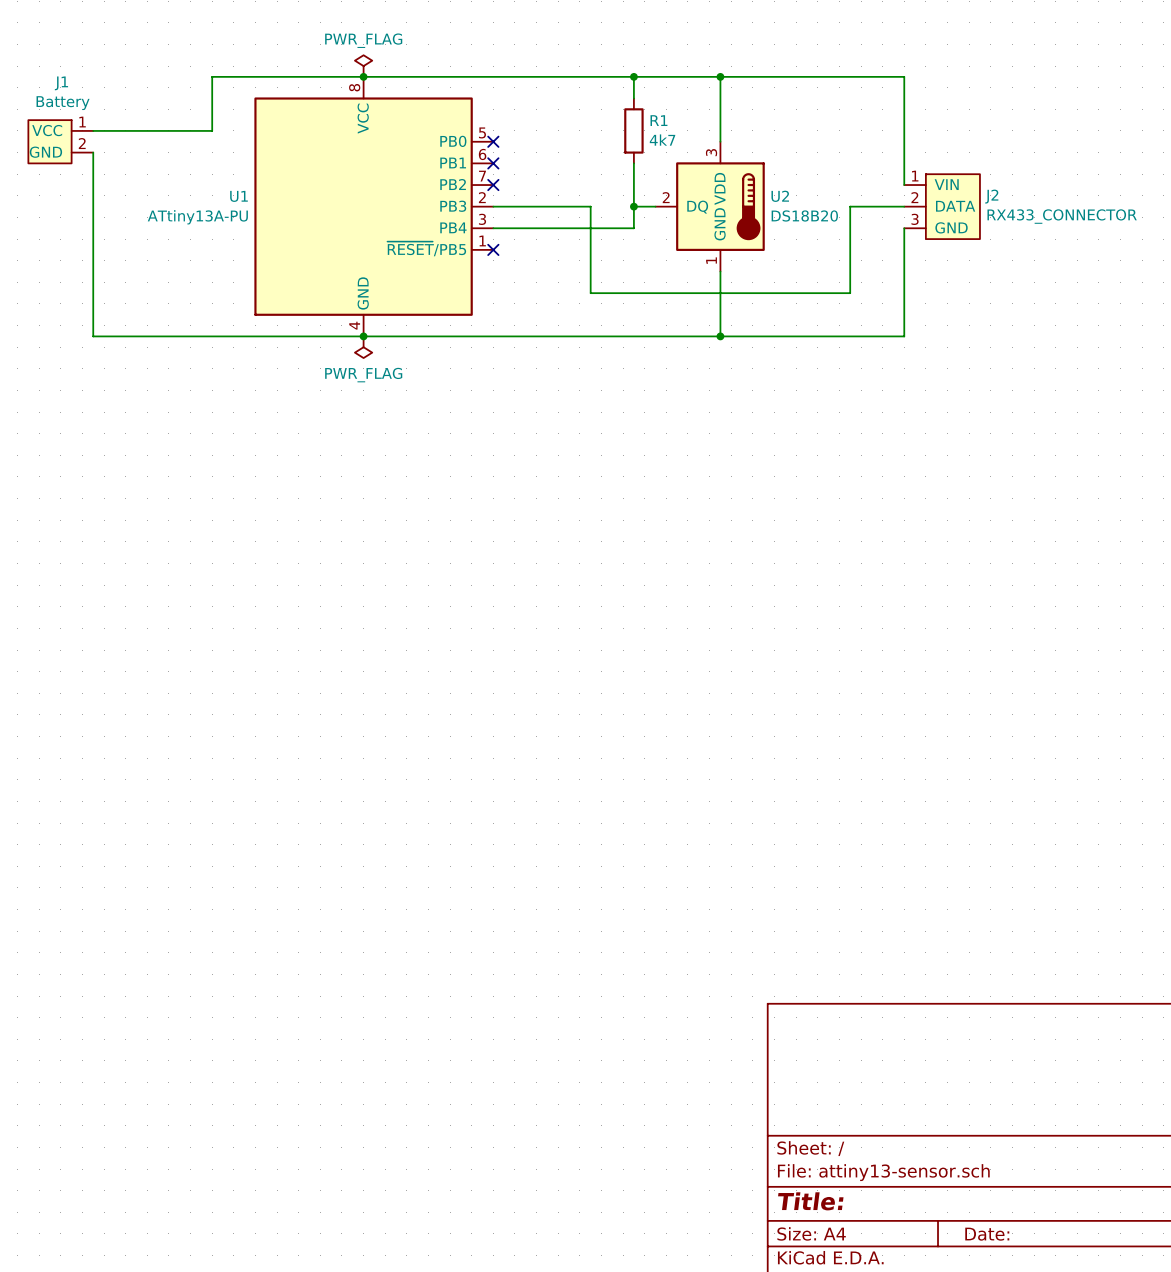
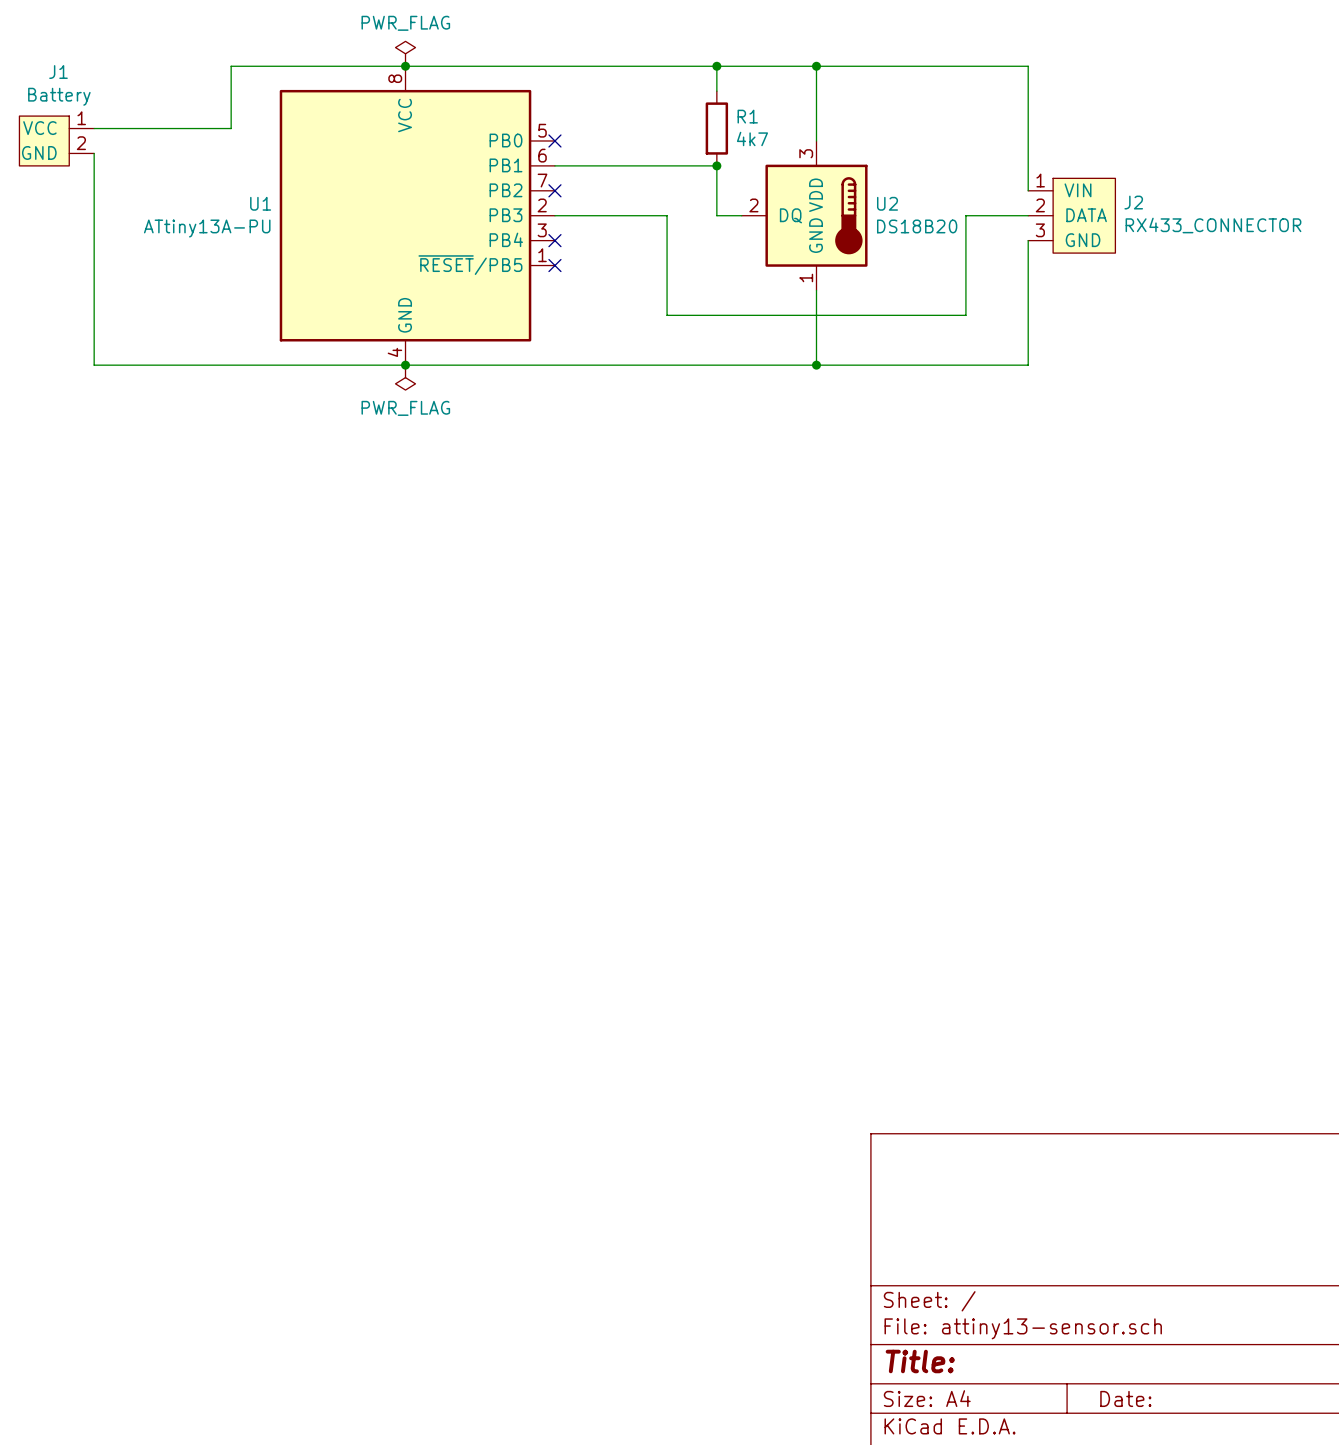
wire: none -> (554, 165) (716, 165)
no-connect mark: (493, 163) -> none
wire: (633, 206) (633, 228) (493, 228) -> none
junction position: (633, 206) -> (716, 165)
no-connect mark: none -> (554, 240)

